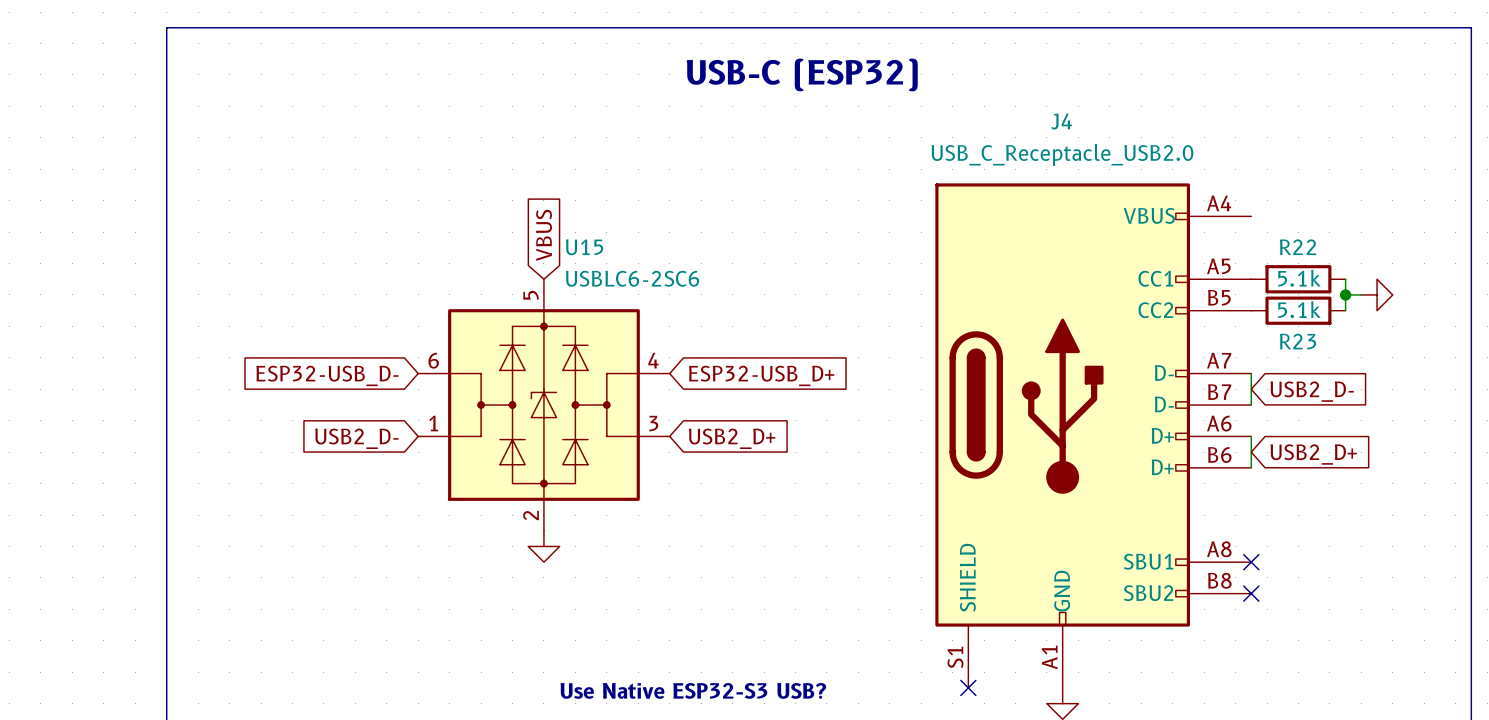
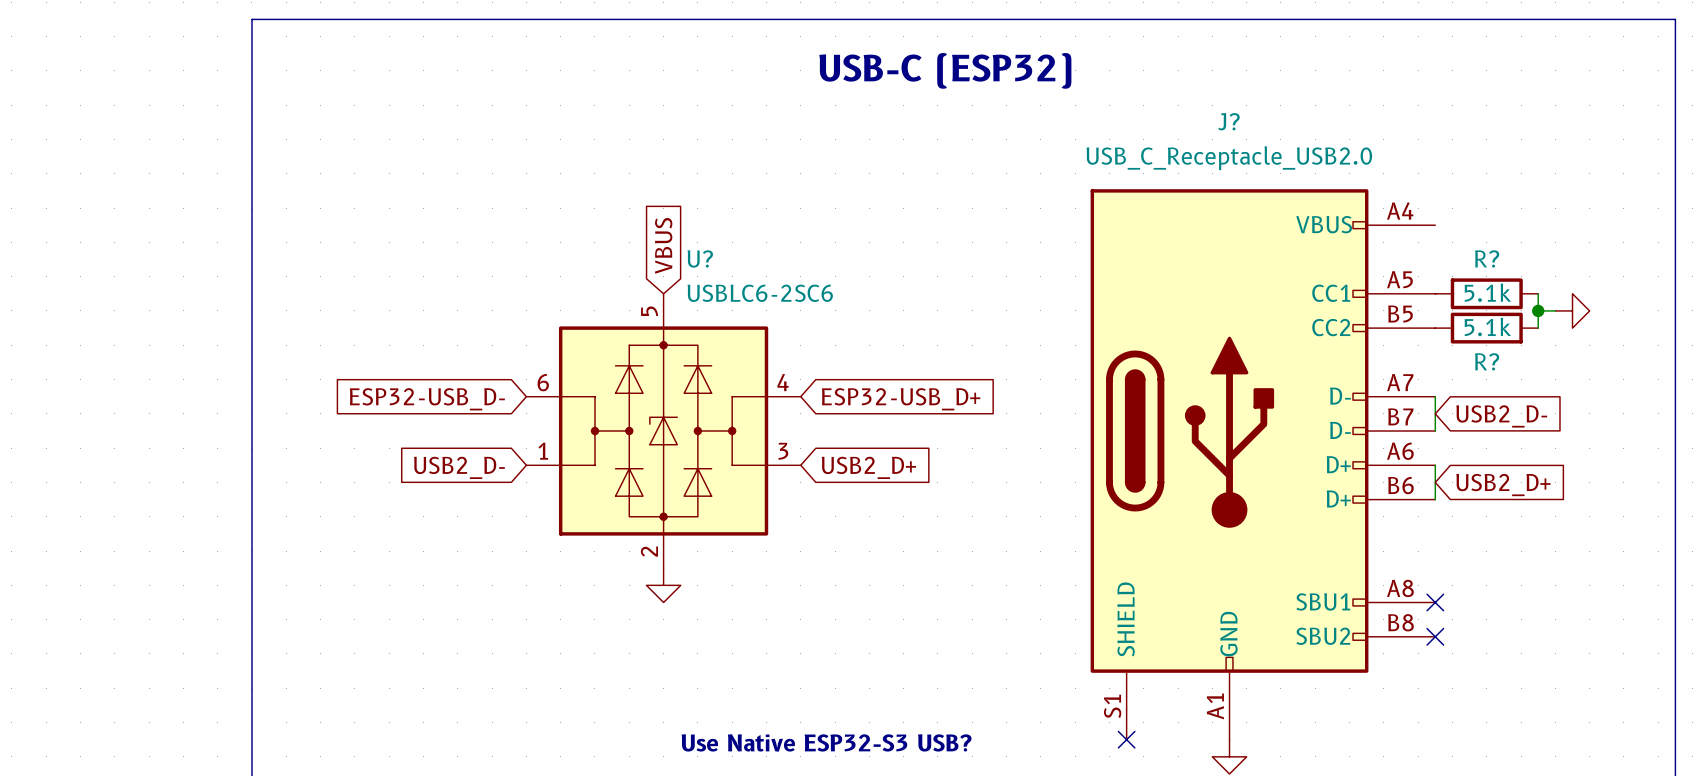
J4 name: J4 (1061, 121) -> J? (1228, 121)
U15 name: U15 (584, 247) -> U? (700, 258)
R22 name: R22 (1297, 247) -> R? (1487, 258)
R23 name: R23 (1297, 341) -> R? (1487, 361)

